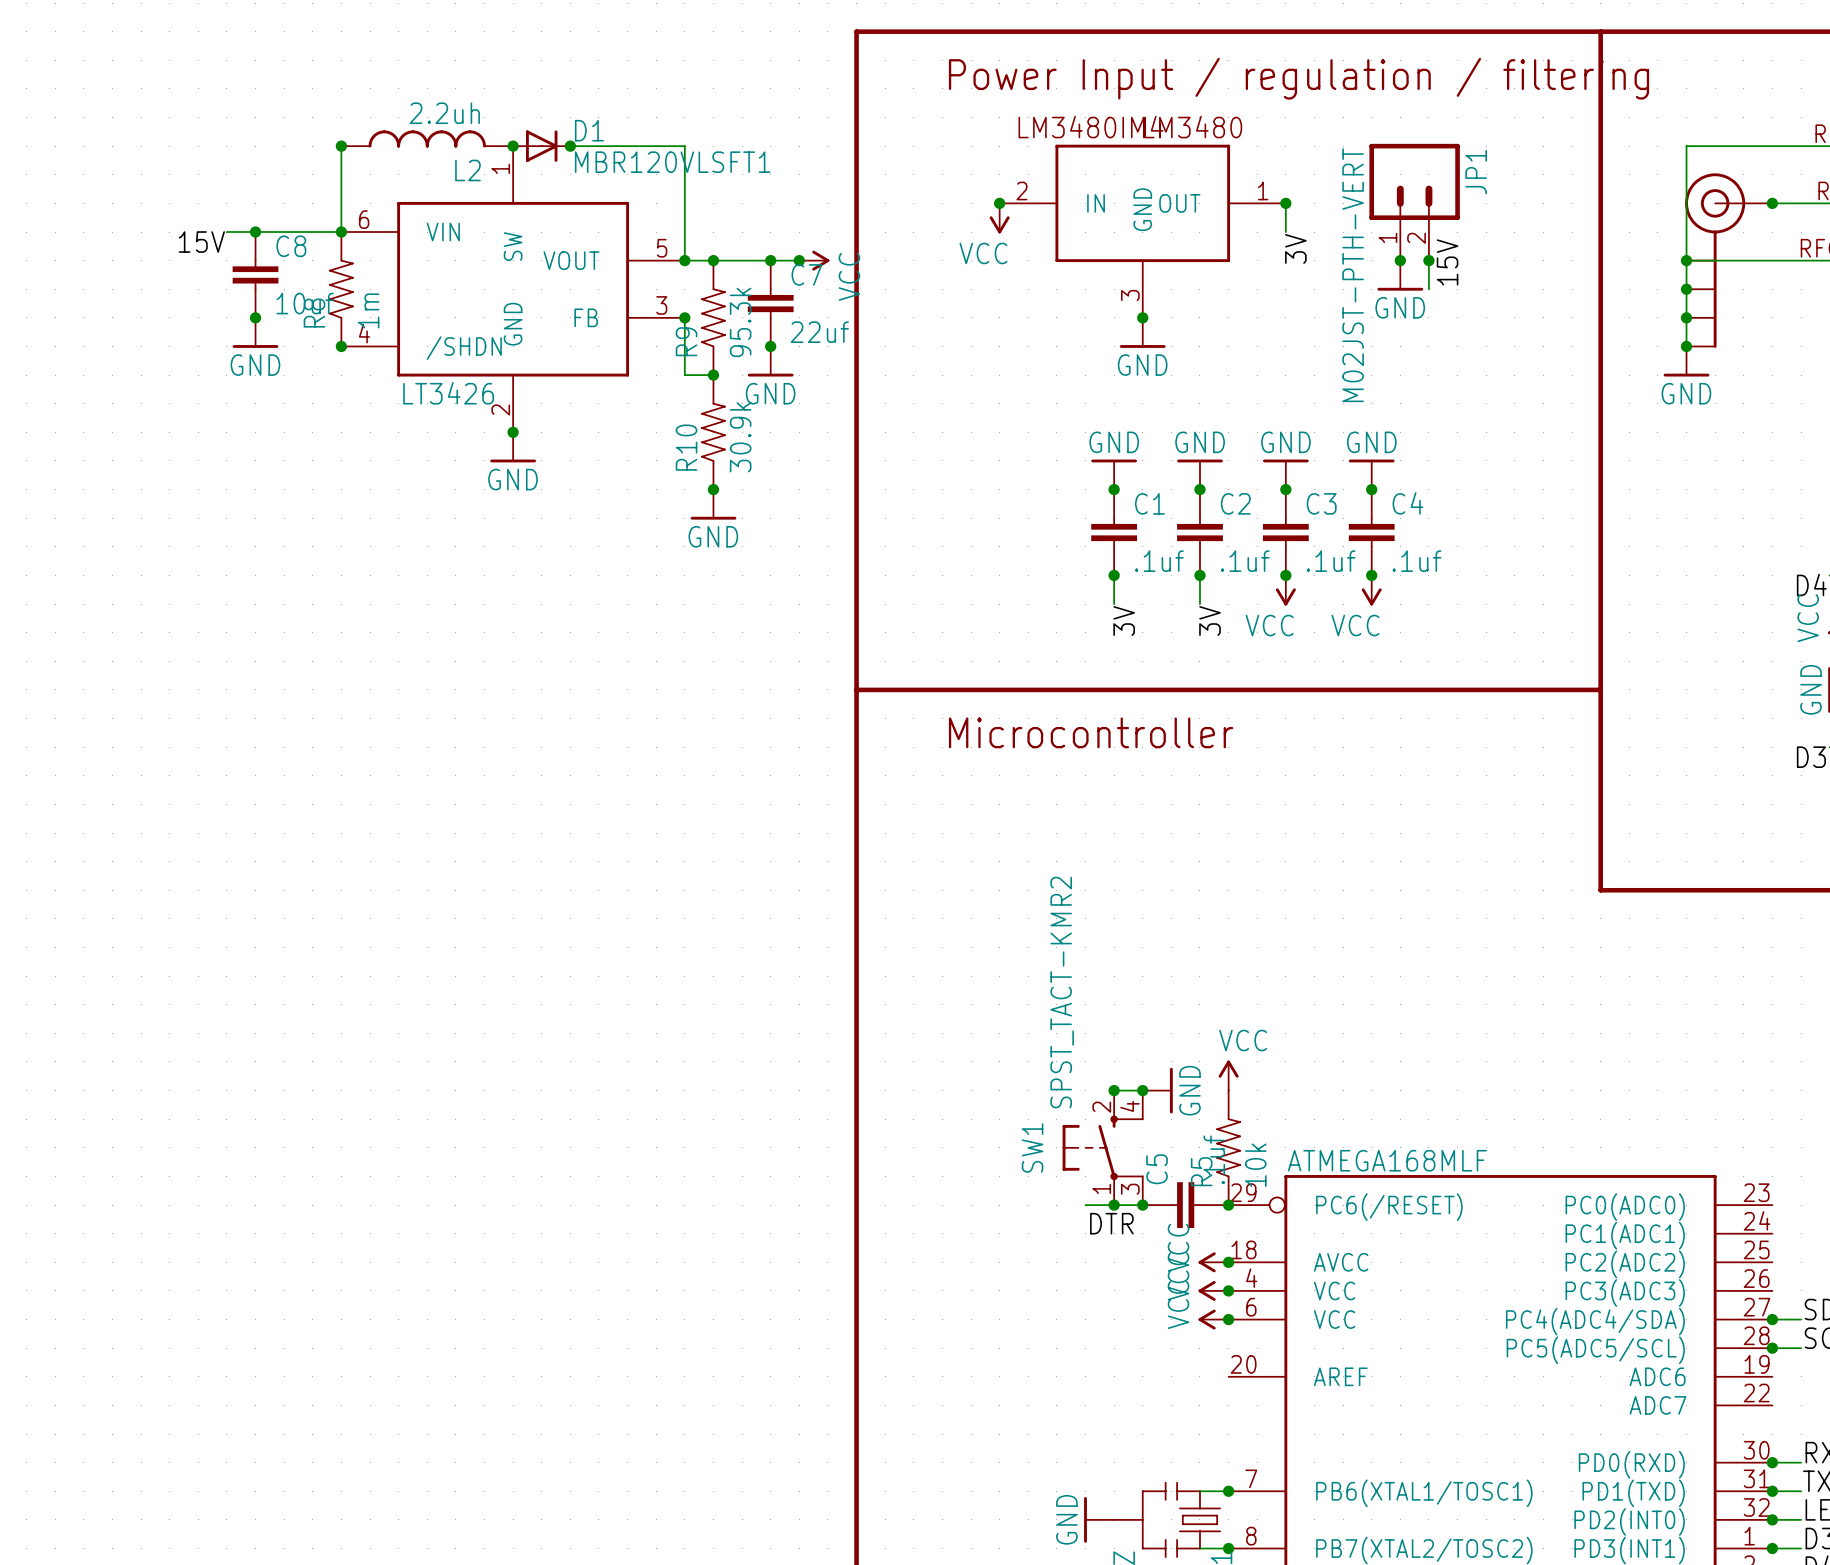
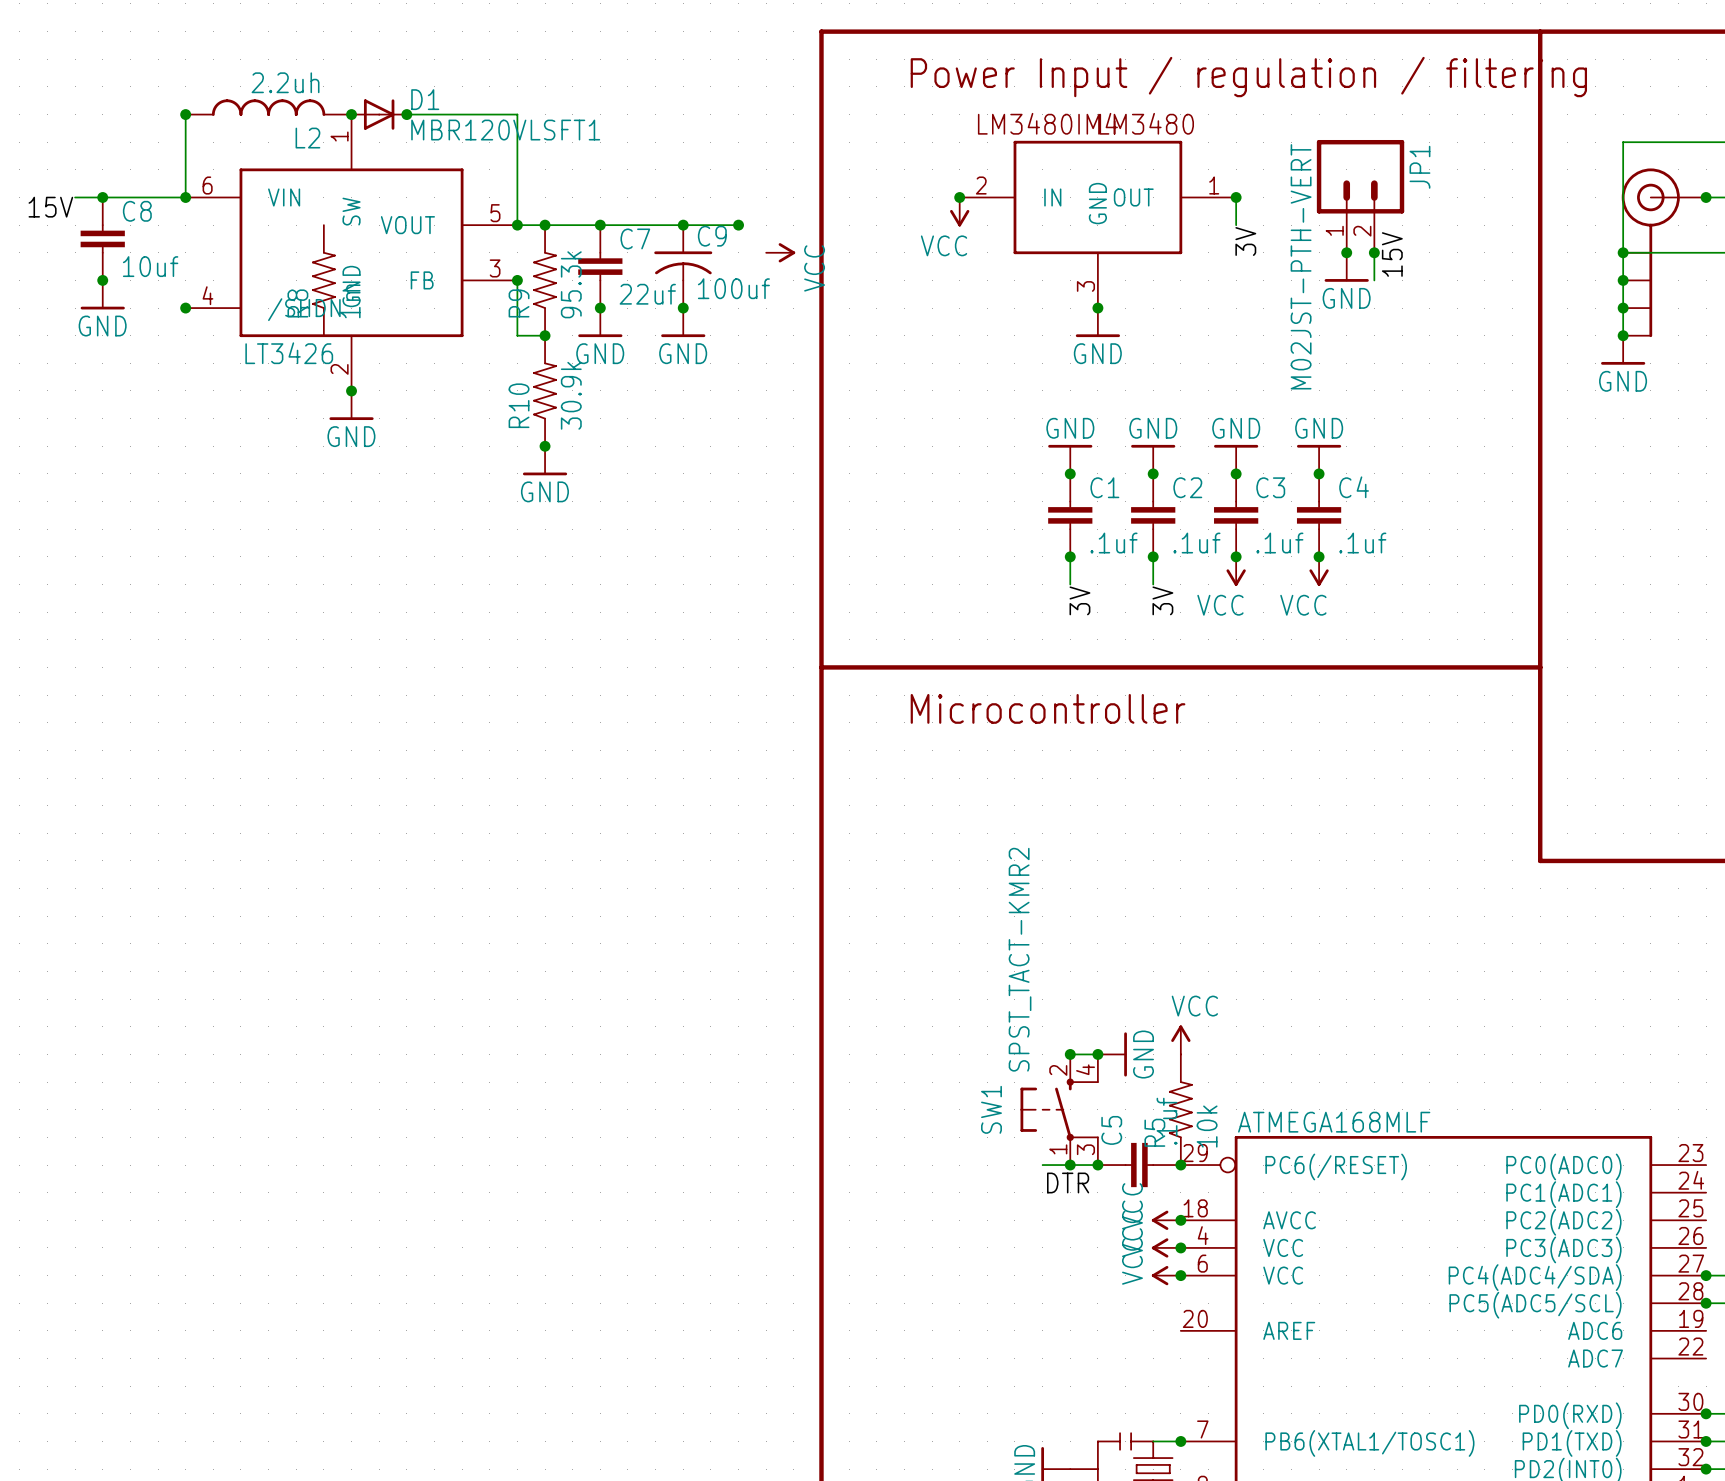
junction: none -> (185, 114)
wire: none -> (406, 114) (517, 114) (517, 225) (738, 225)
junction: none -> (406, 114)
L2 position: (427, 138) -> (268, 107)
wire: (341, 146) (341, 232) (226, 232) -> (185, 114) (185, 197) (75, 197)
junction position: (341, 146) -> (351, 114)
junction: (513, 146) -> none
D1 position: (541, 146) -> (379, 114)
wire: (570, 146) (684, 146) (684, 260) (799, 260) -> none
junction: (570, 146) -> none
junction: none -> (102, 197)
junction: none -> (185, 197)
junction: (255, 232) -> none
junction: (341, 232) -> none
junction: none -> (517, 225)
junction: none -> (545, 225)
junction: none -> (600, 225)
junction: none -> (683, 225)
junction: none -> (738, 225)
label position: 15V (201, 242) -> 15V (50, 207)
junction: (684, 260) -> none
junction: (713, 260) -> none
junction: (770, 260) -> none
junction: (799, 260) -> none
C8 position: (255, 274) -> (102, 238)
C9: none -> 100uf (683, 266)
junction: none -> (102, 280)
part position: (513, 289) -> (351, 252)
junction: none -> (517, 280)
C7 position: (770, 303) -> (600, 266)
power symbol: none -> GND (102, 294)
junction: none -> (185, 308)
junction: (255, 317) -> none
junction: none -> (600, 308)
wire: (684, 317) (684, 375) (713, 375) -> (517, 280) (517, 335) (545, 335)
junction: (684, 317) -> none
R9 position: (713, 317) -> (545, 280)
junction: none -> (683, 308)
power symbol: GND (255, 332) -> none
power symbol: none -> GND (600, 322)
junction position: (341, 346) -> (351, 390)
junction: none -> (545, 335)
junction: (770, 346) -> none
power symbol position: GND (770, 361) -> GND (683, 322)
junction: (713, 375) -> none
power symbol: none -> GND (351, 405)
junction: (513, 432) -> none
R10 position: (713, 432) -> (545, 390)
power symbol position: GND (513, 447) -> GND (545, 460)
junction: none -> (545, 446)
junction: (713, 489) -> none
power symbol: GND (713, 504) -> none

